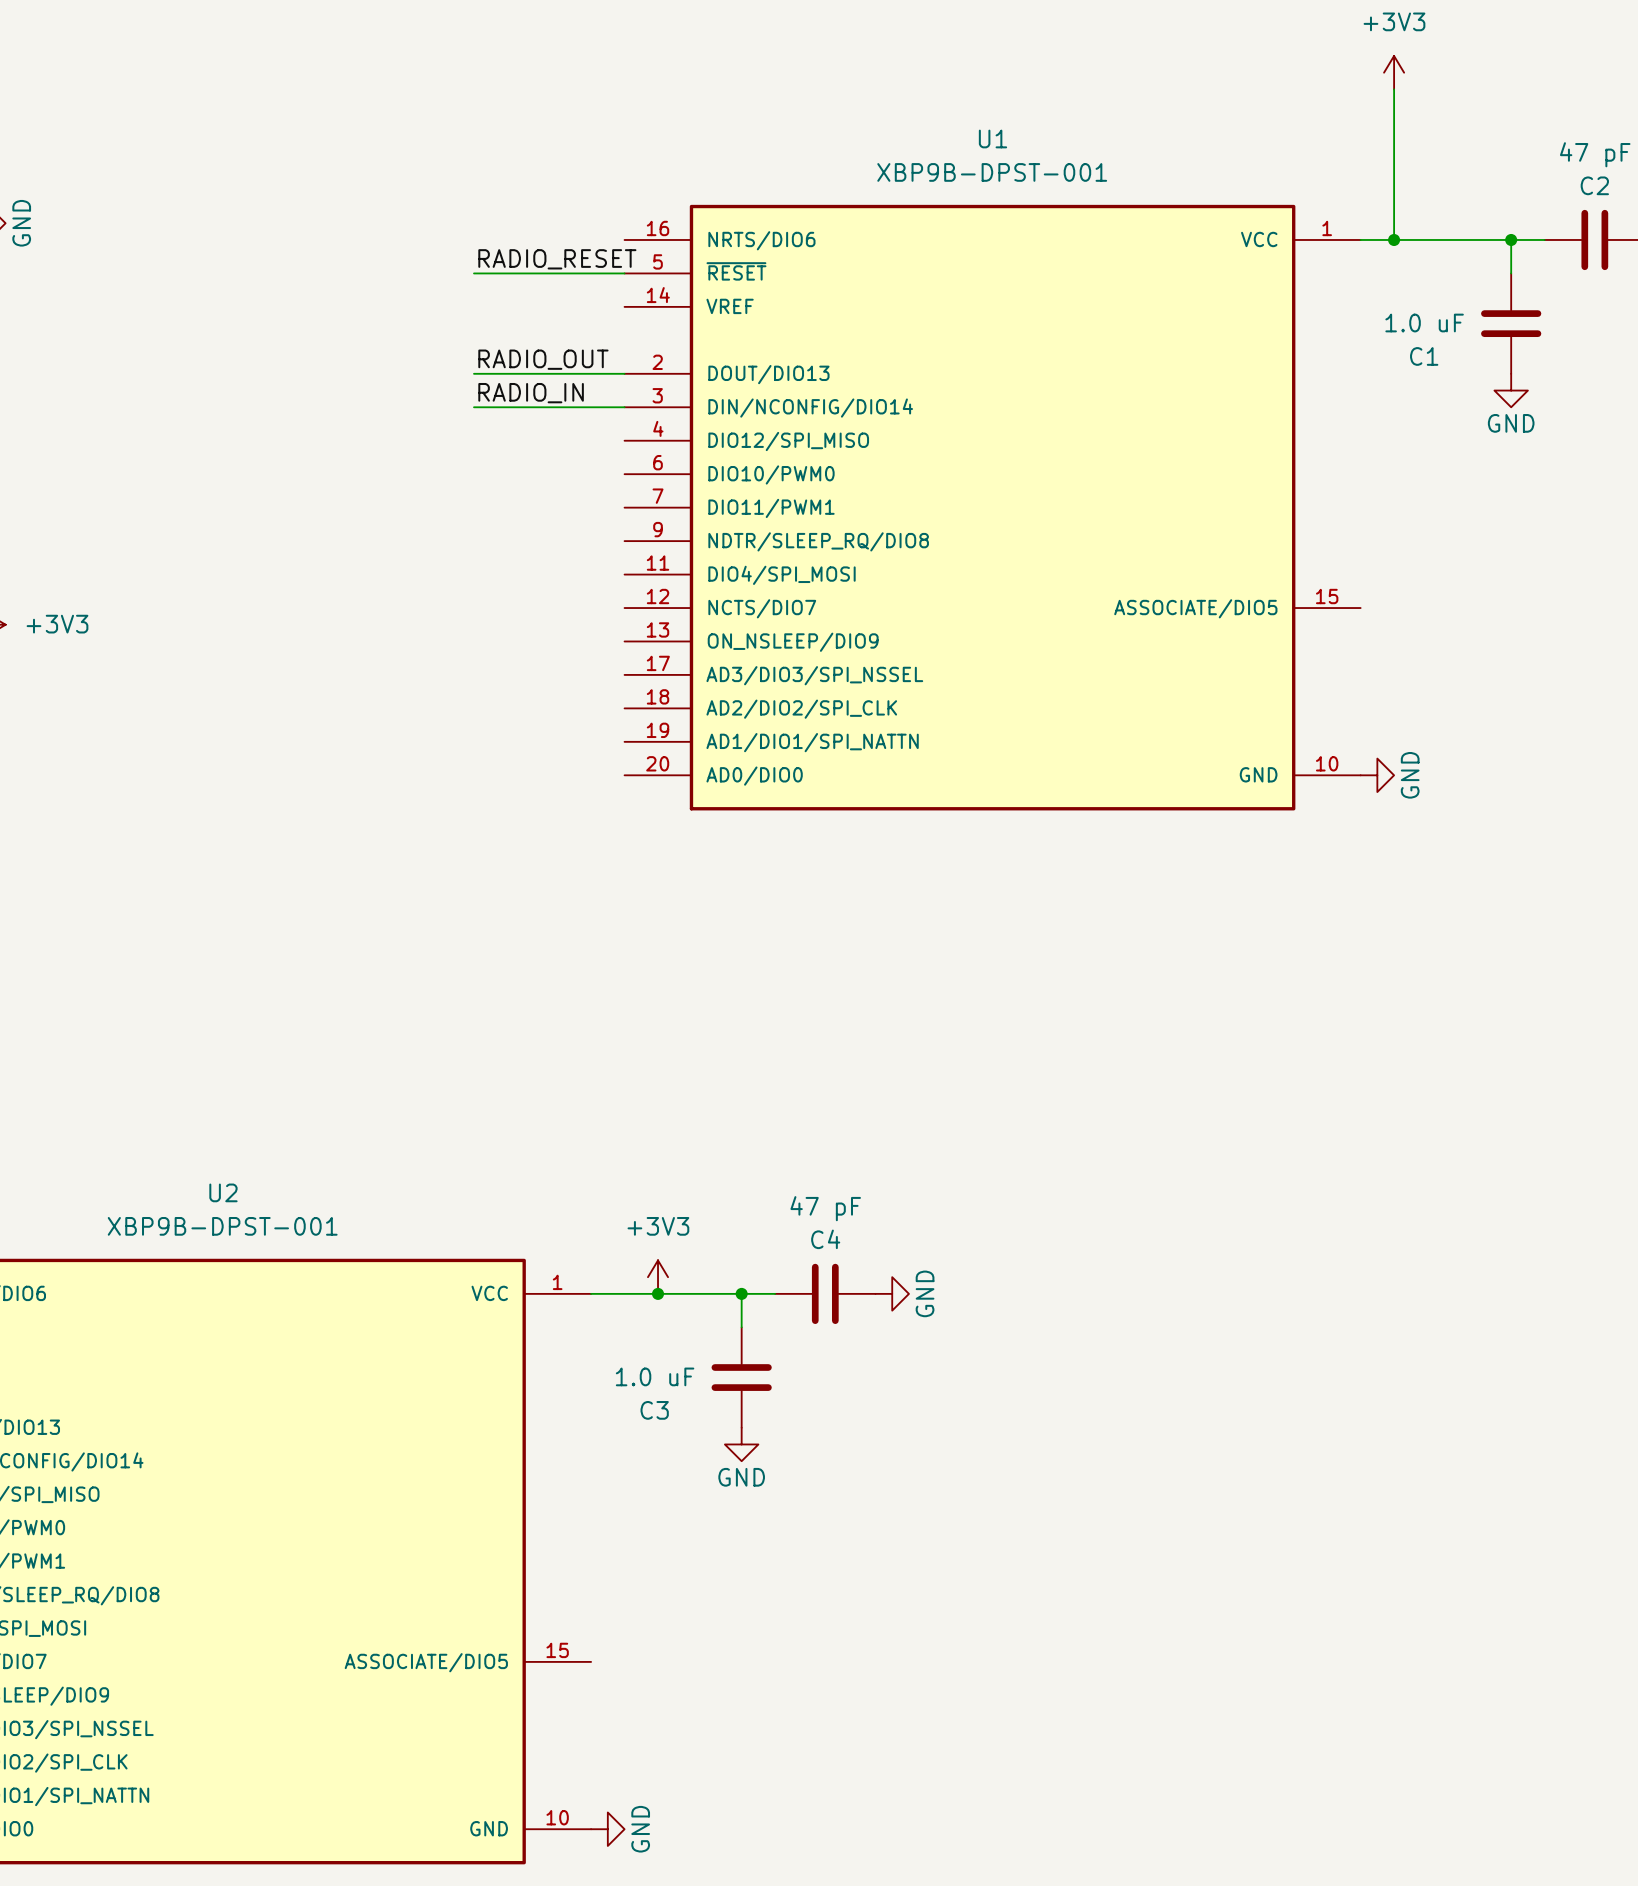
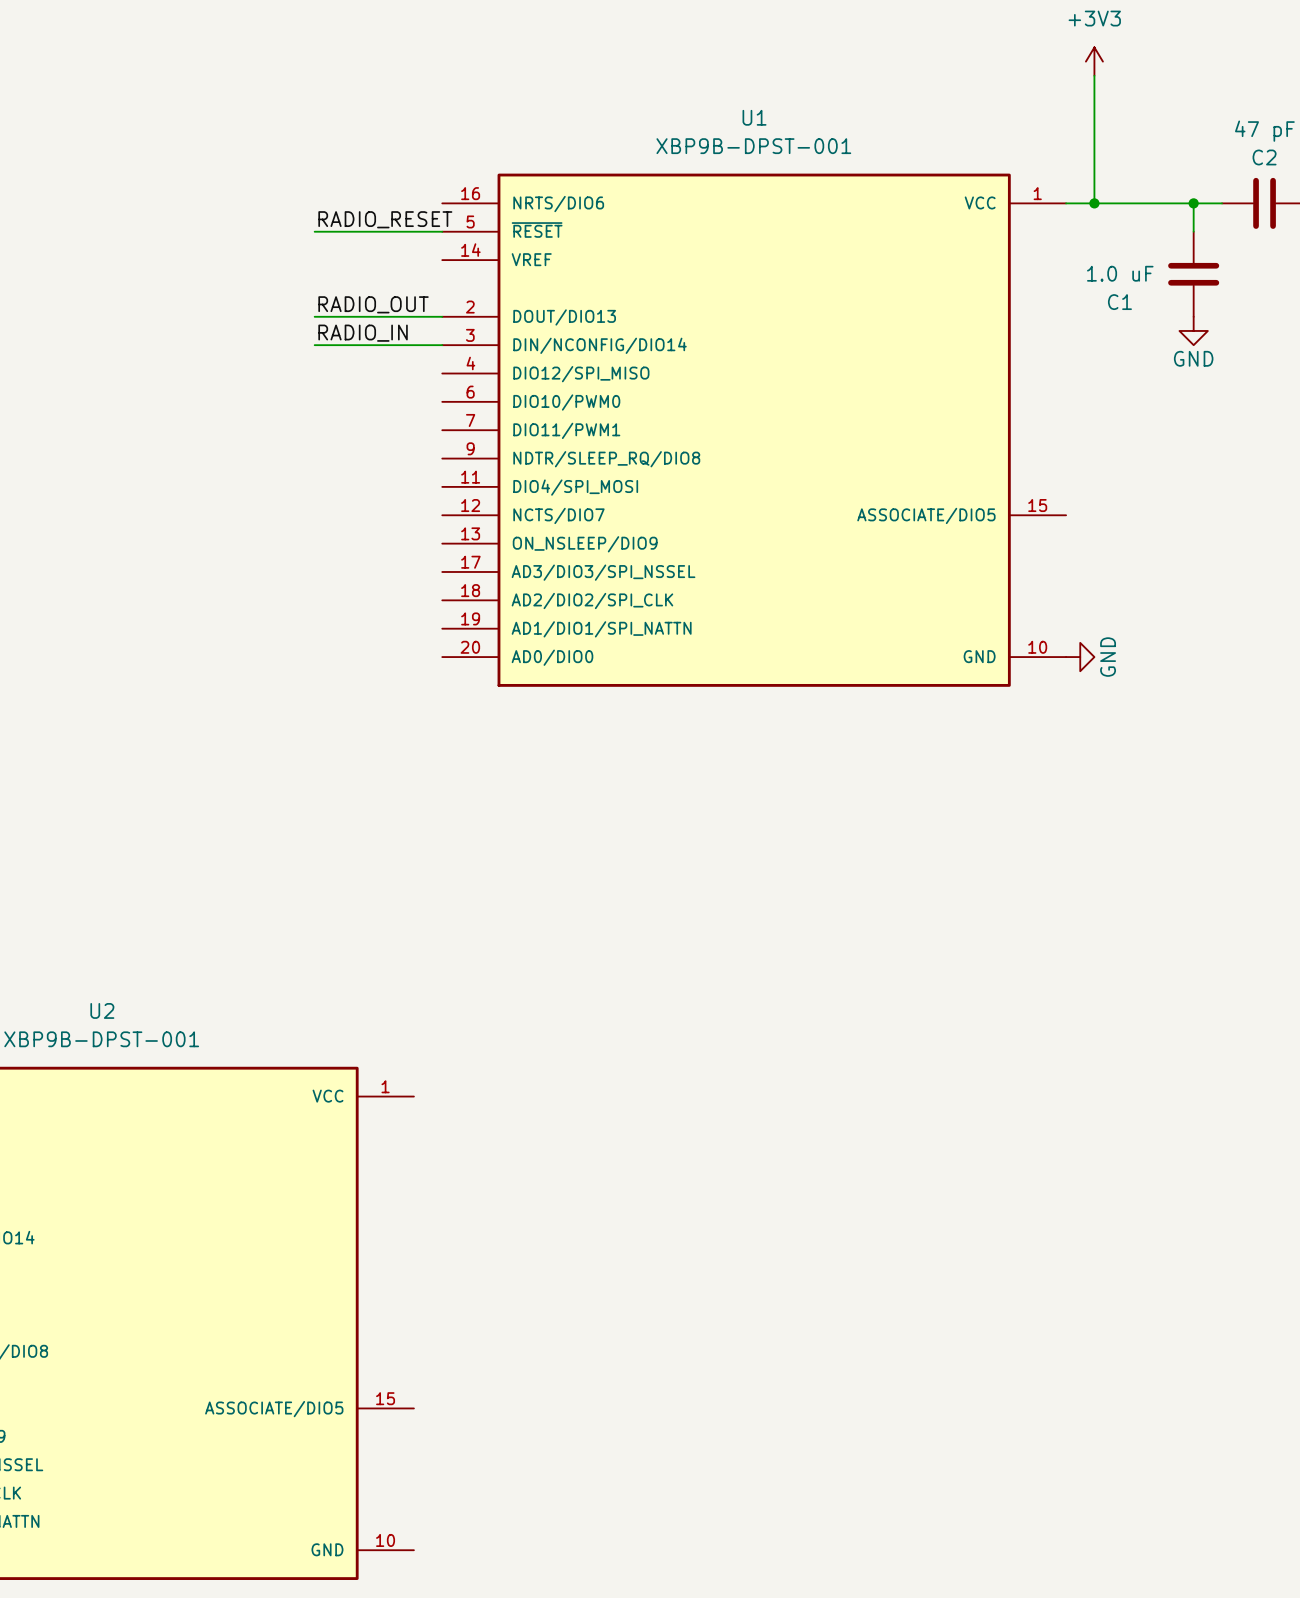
power symbol: +3V3 (658, 1277) -> none
wire: (591, 1293) (775, 1293) -> none
junction: (658, 1293) -> none
wire: (741, 1293) (741, 1327) -> none
junction: (741, 1293) -> none
C4: 47 pF (825, 1293) -> none
power symbol: GND (892, 1293) -> none
C3: 1.0 uF (741, 1377) -> none
power symbol: GND (741, 1444) -> none
power symbol: GND (607, 1829) -> none

